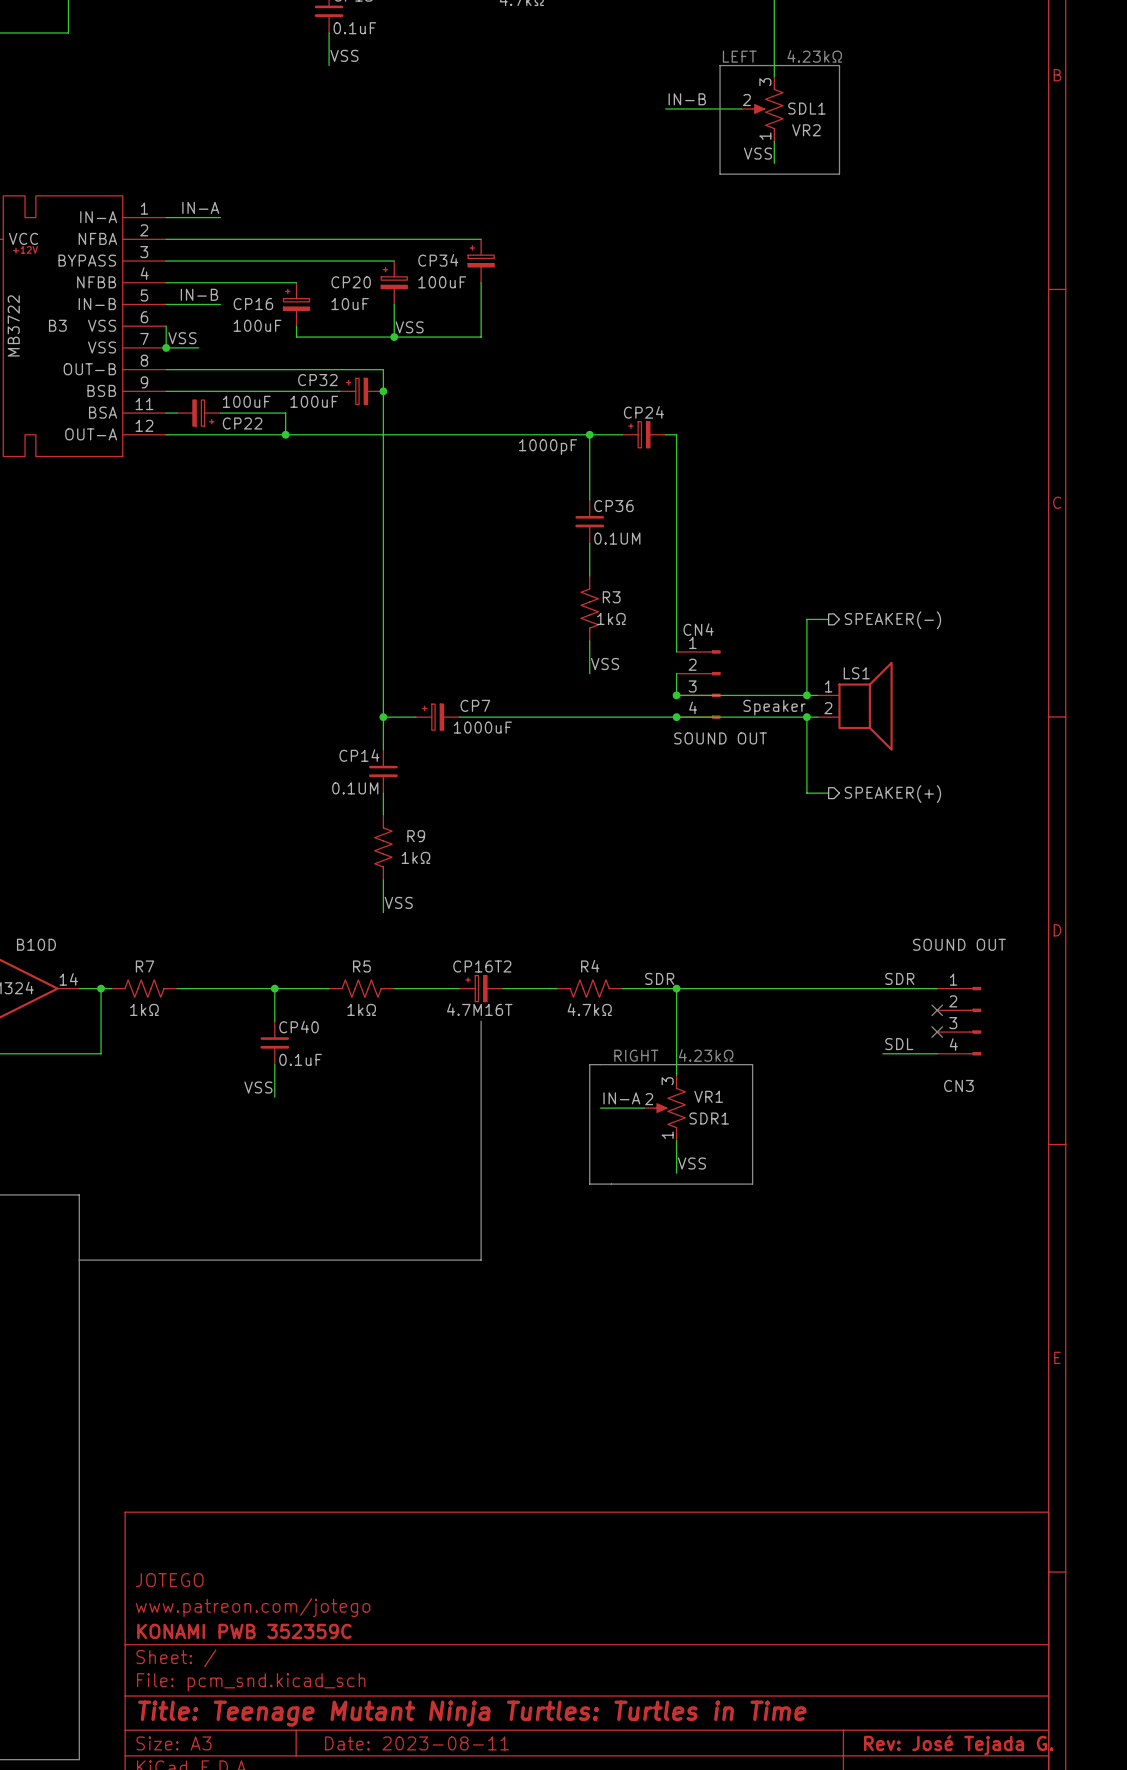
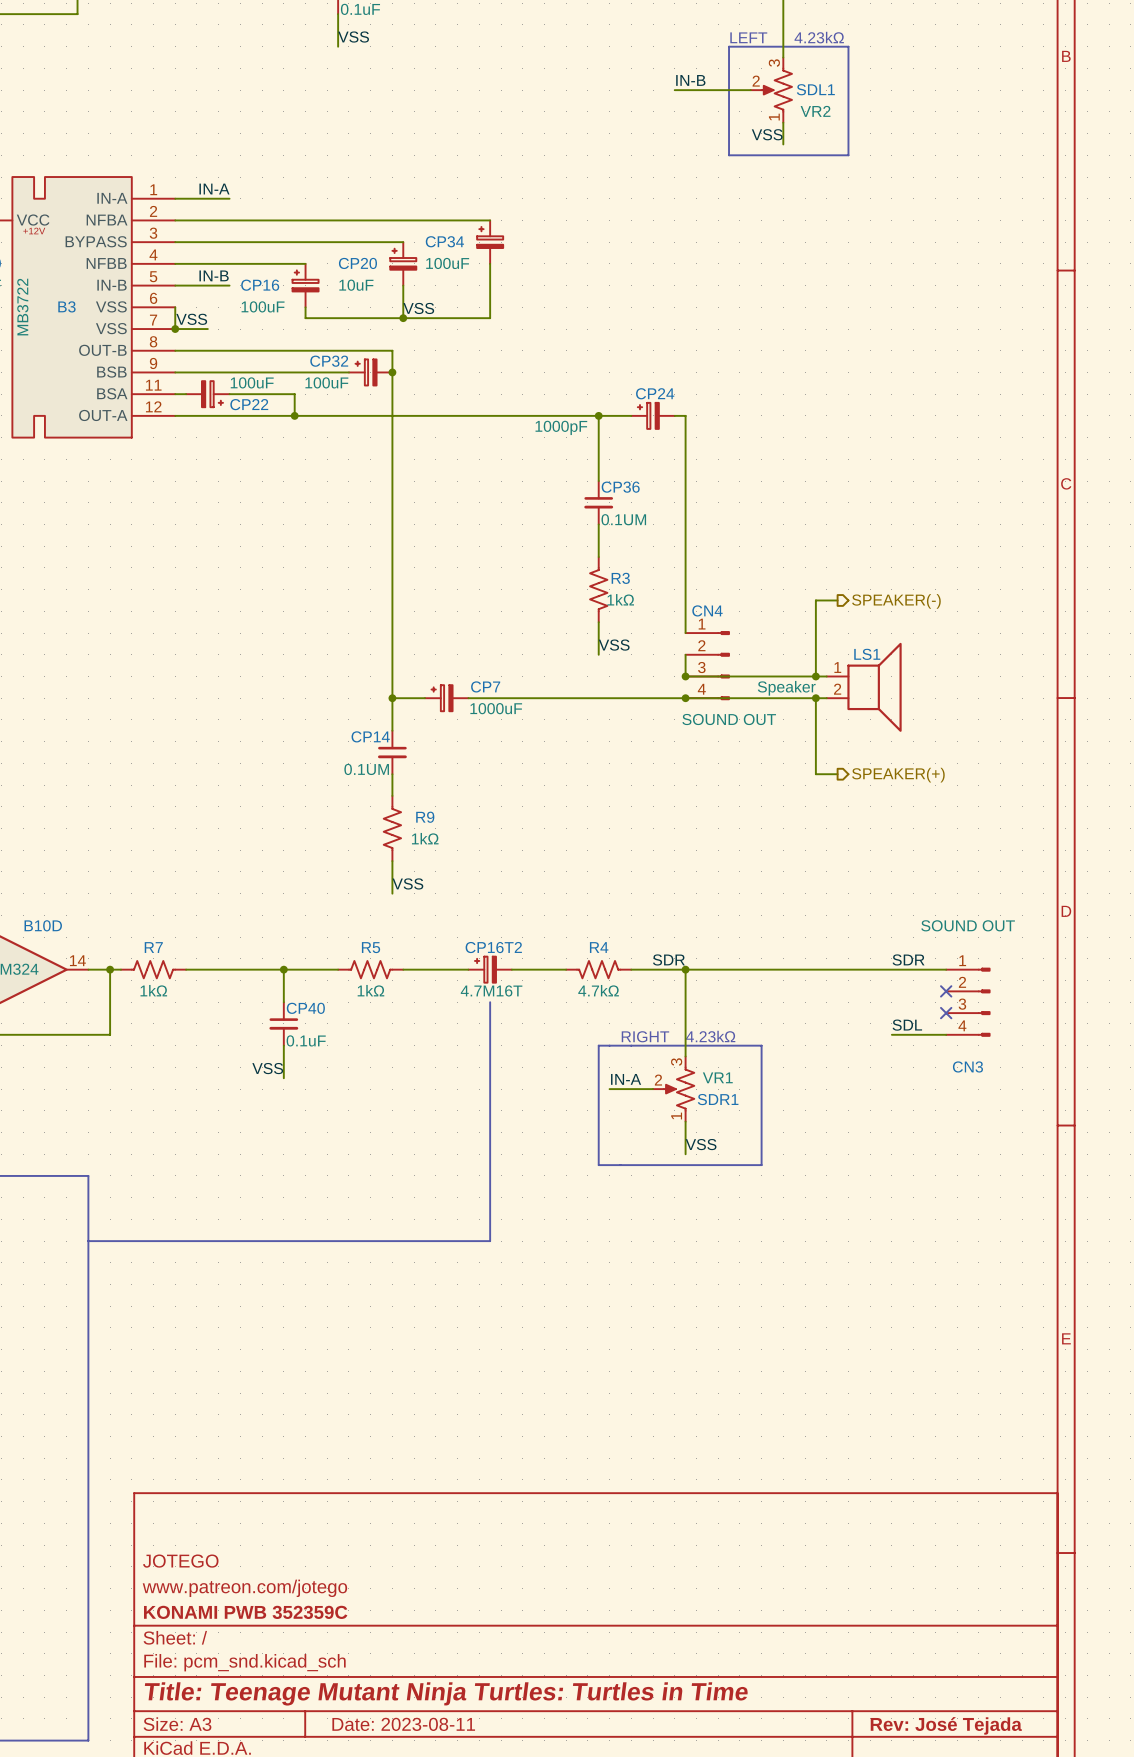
title block: Rev: José Tejada G. (958, 1745) -> Rev: José Tejada (946, 1725)

